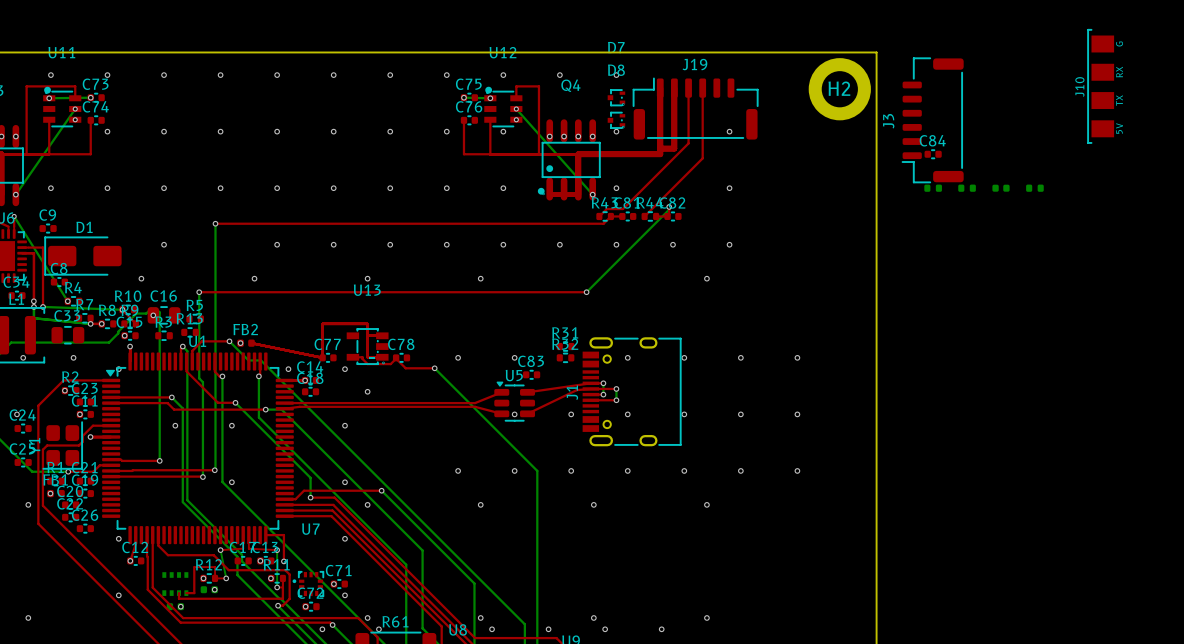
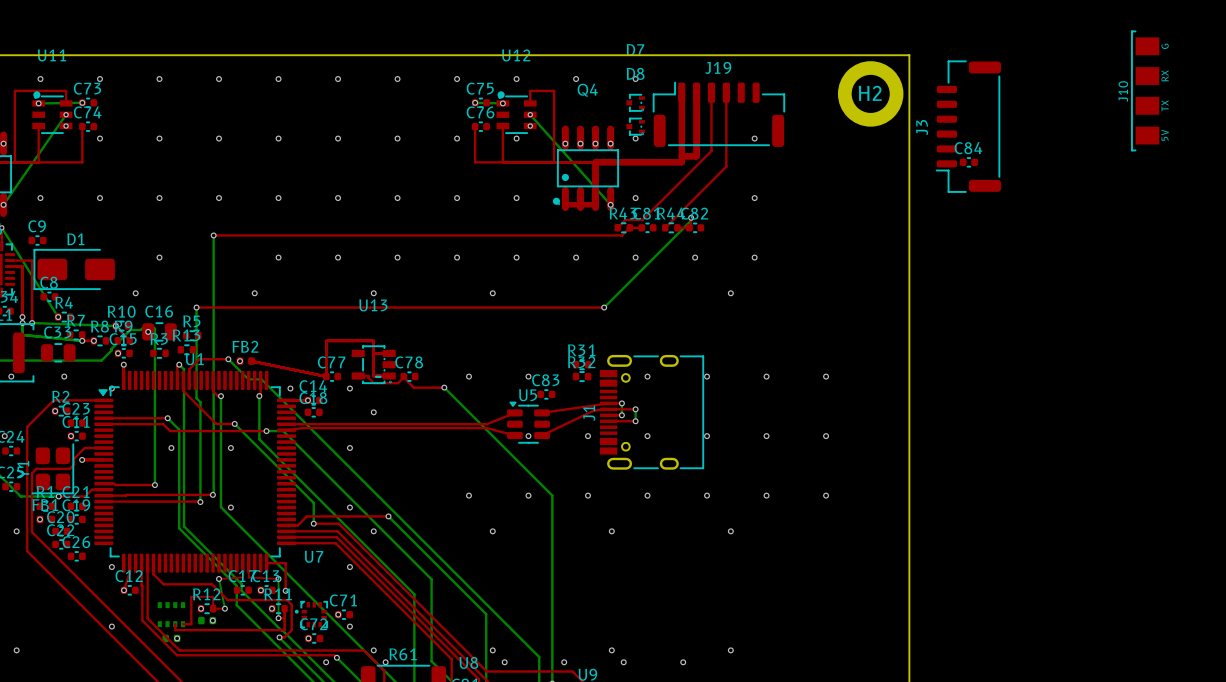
part: (933, 188) -> none
part: (967, 188) -> none
part: (1000, 188) -> none
part: (1034, 188) -> none

